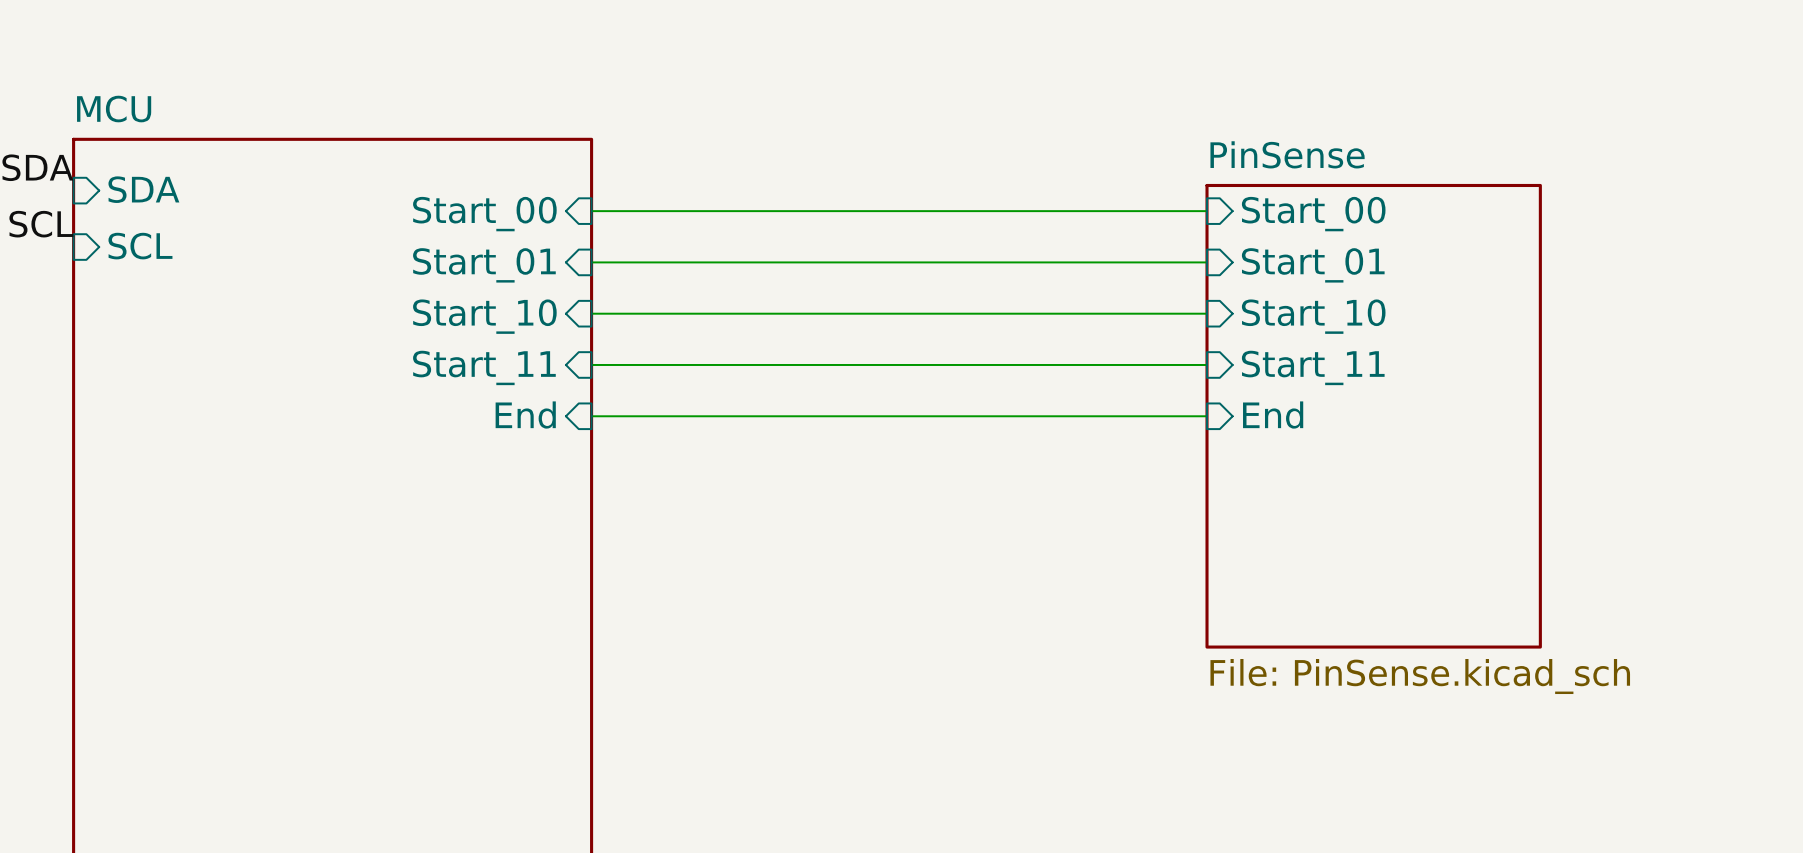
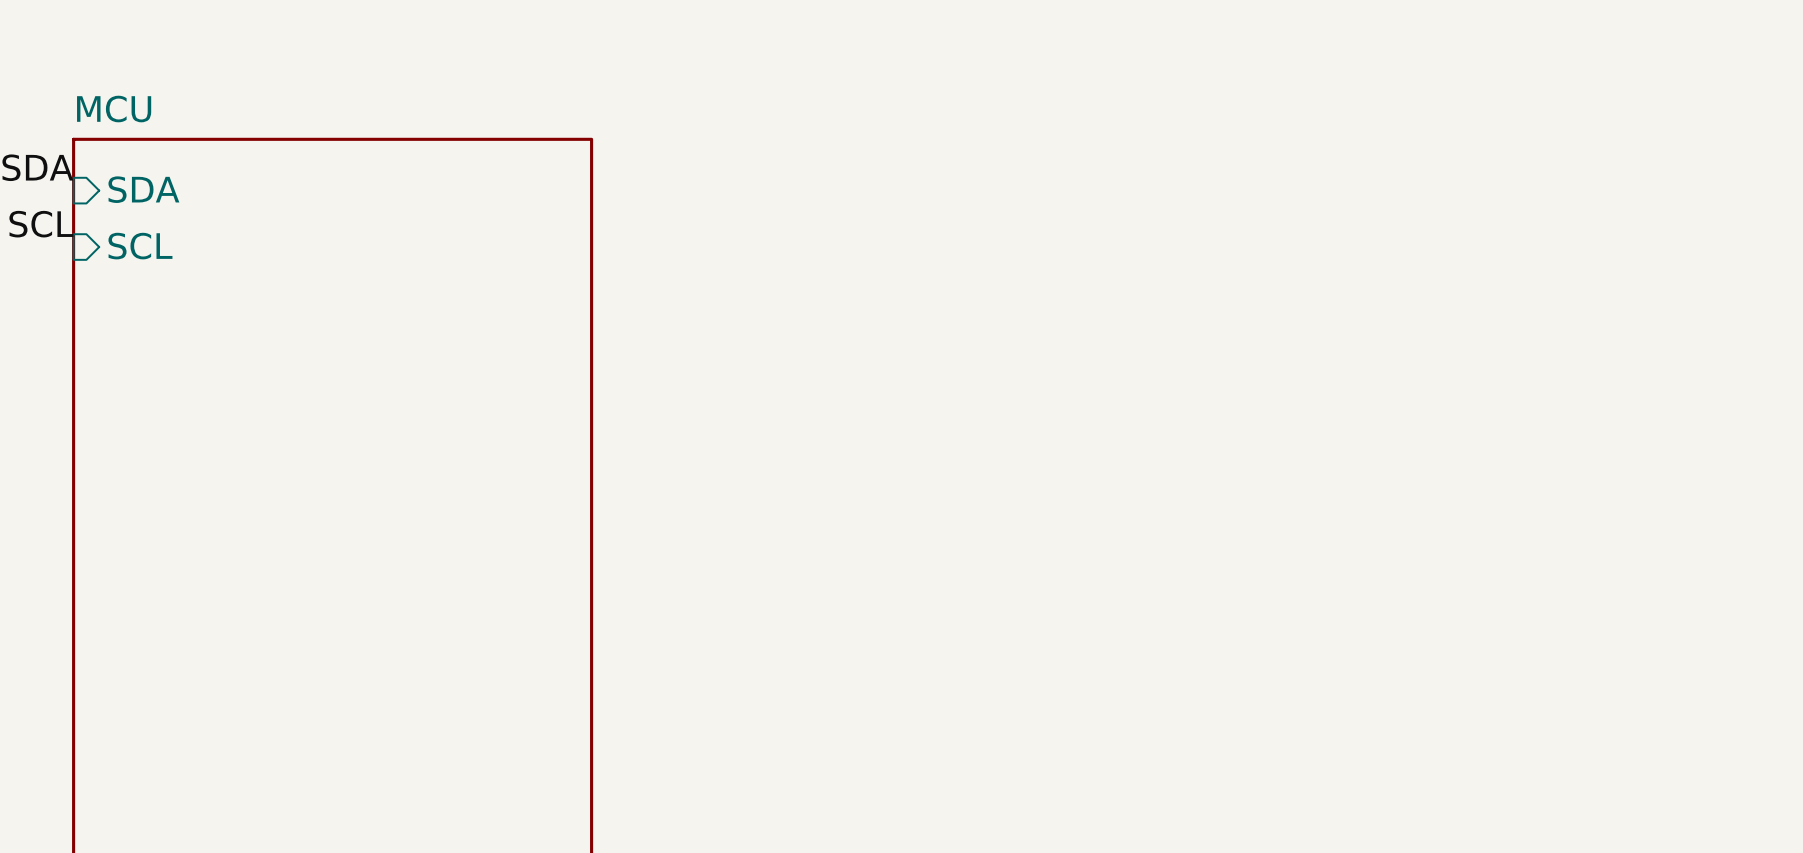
wire: (591, 211) (1207, 211) -> none
sheet pin: Start_00 (484, 214) -> none
sheet pin: Start_00 (1313, 214) -> none
wire: (591, 262) (1207, 262) -> none
sheet pin: Start_01 (484, 265) -> none
sheet pin: Start_01 (1313, 265) -> none
wire: (591, 313) (1207, 313) -> none
sheet pin: Start_10 (484, 316) -> none
sheet pin: Start_10 (1313, 316) -> none
wire: (591, 364) (1207, 364) -> none
sheet pin: Start_11 (484, 367) -> none
sheet pin: Start_11 (1313, 367) -> none
sheet pin: End (525, 415) -> none
sheet pin: End (1273, 415) -> none
wire: (591, 416) (1207, 416) -> none
sheet PinSense: File: PinSense.kicad_sch (1373, 416) -> none

